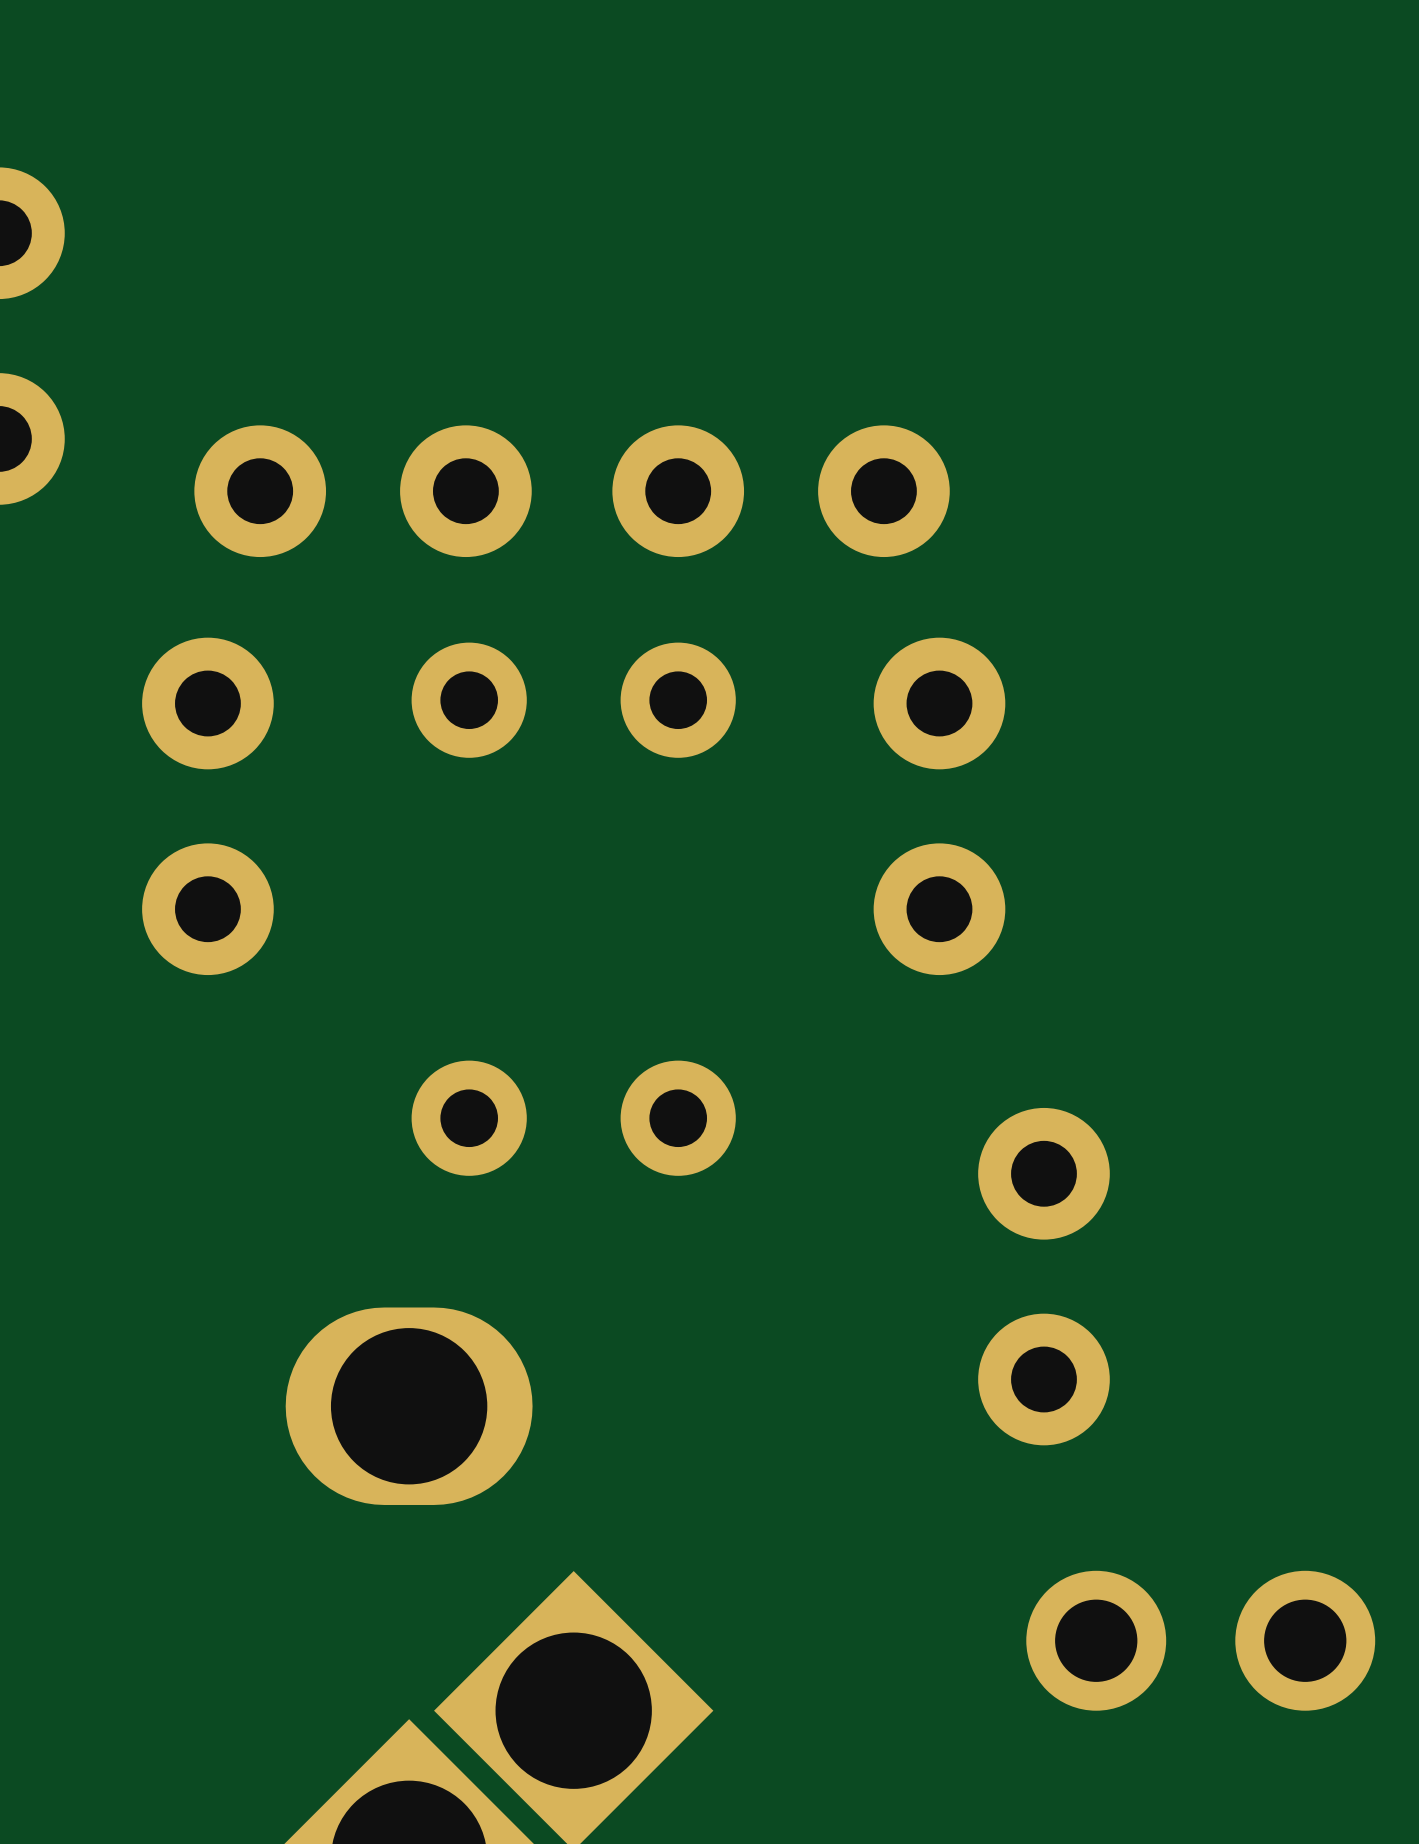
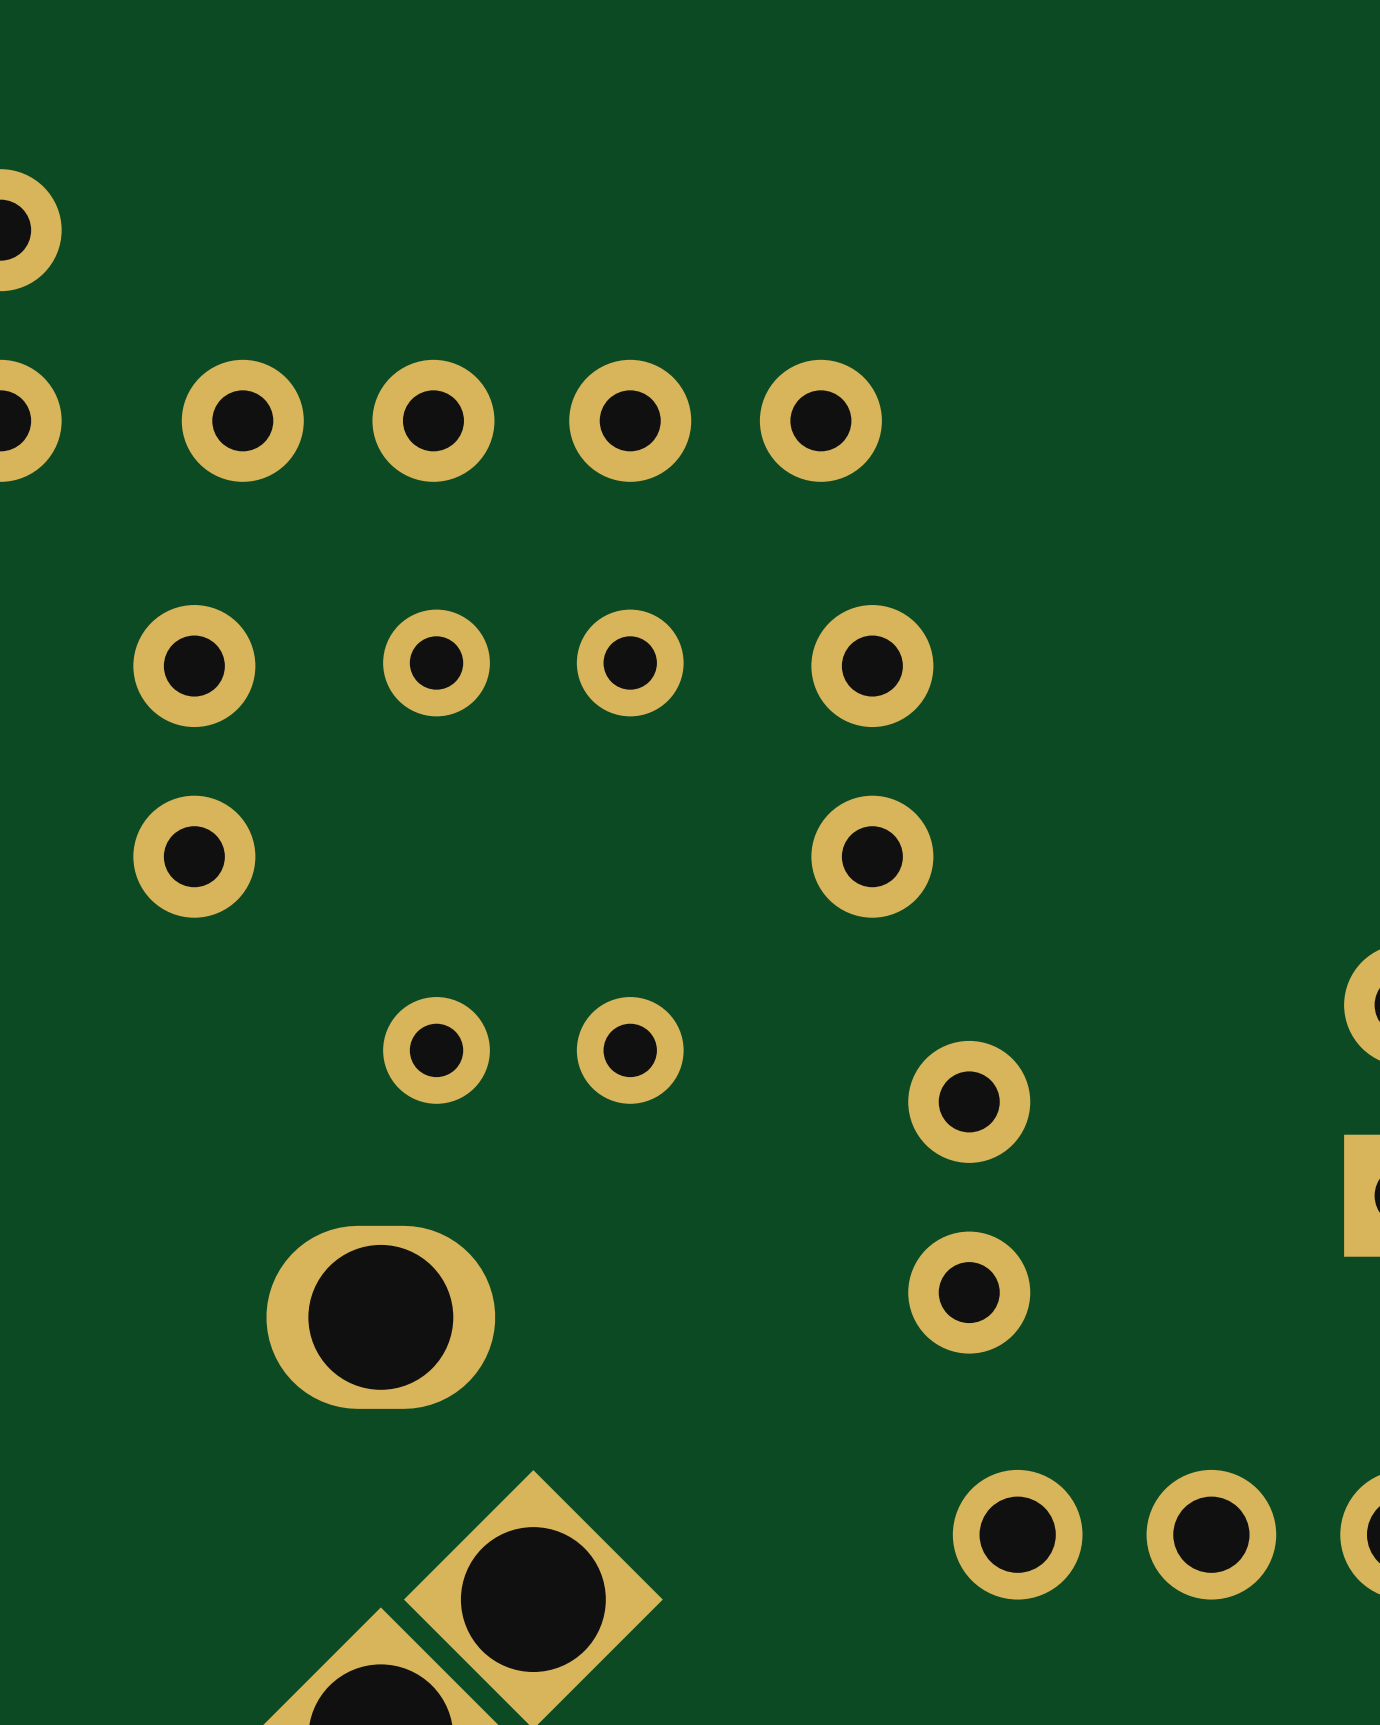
part position: (363, 491) -> (338, 420)
part position: (781, 491) -> (725, 420)

